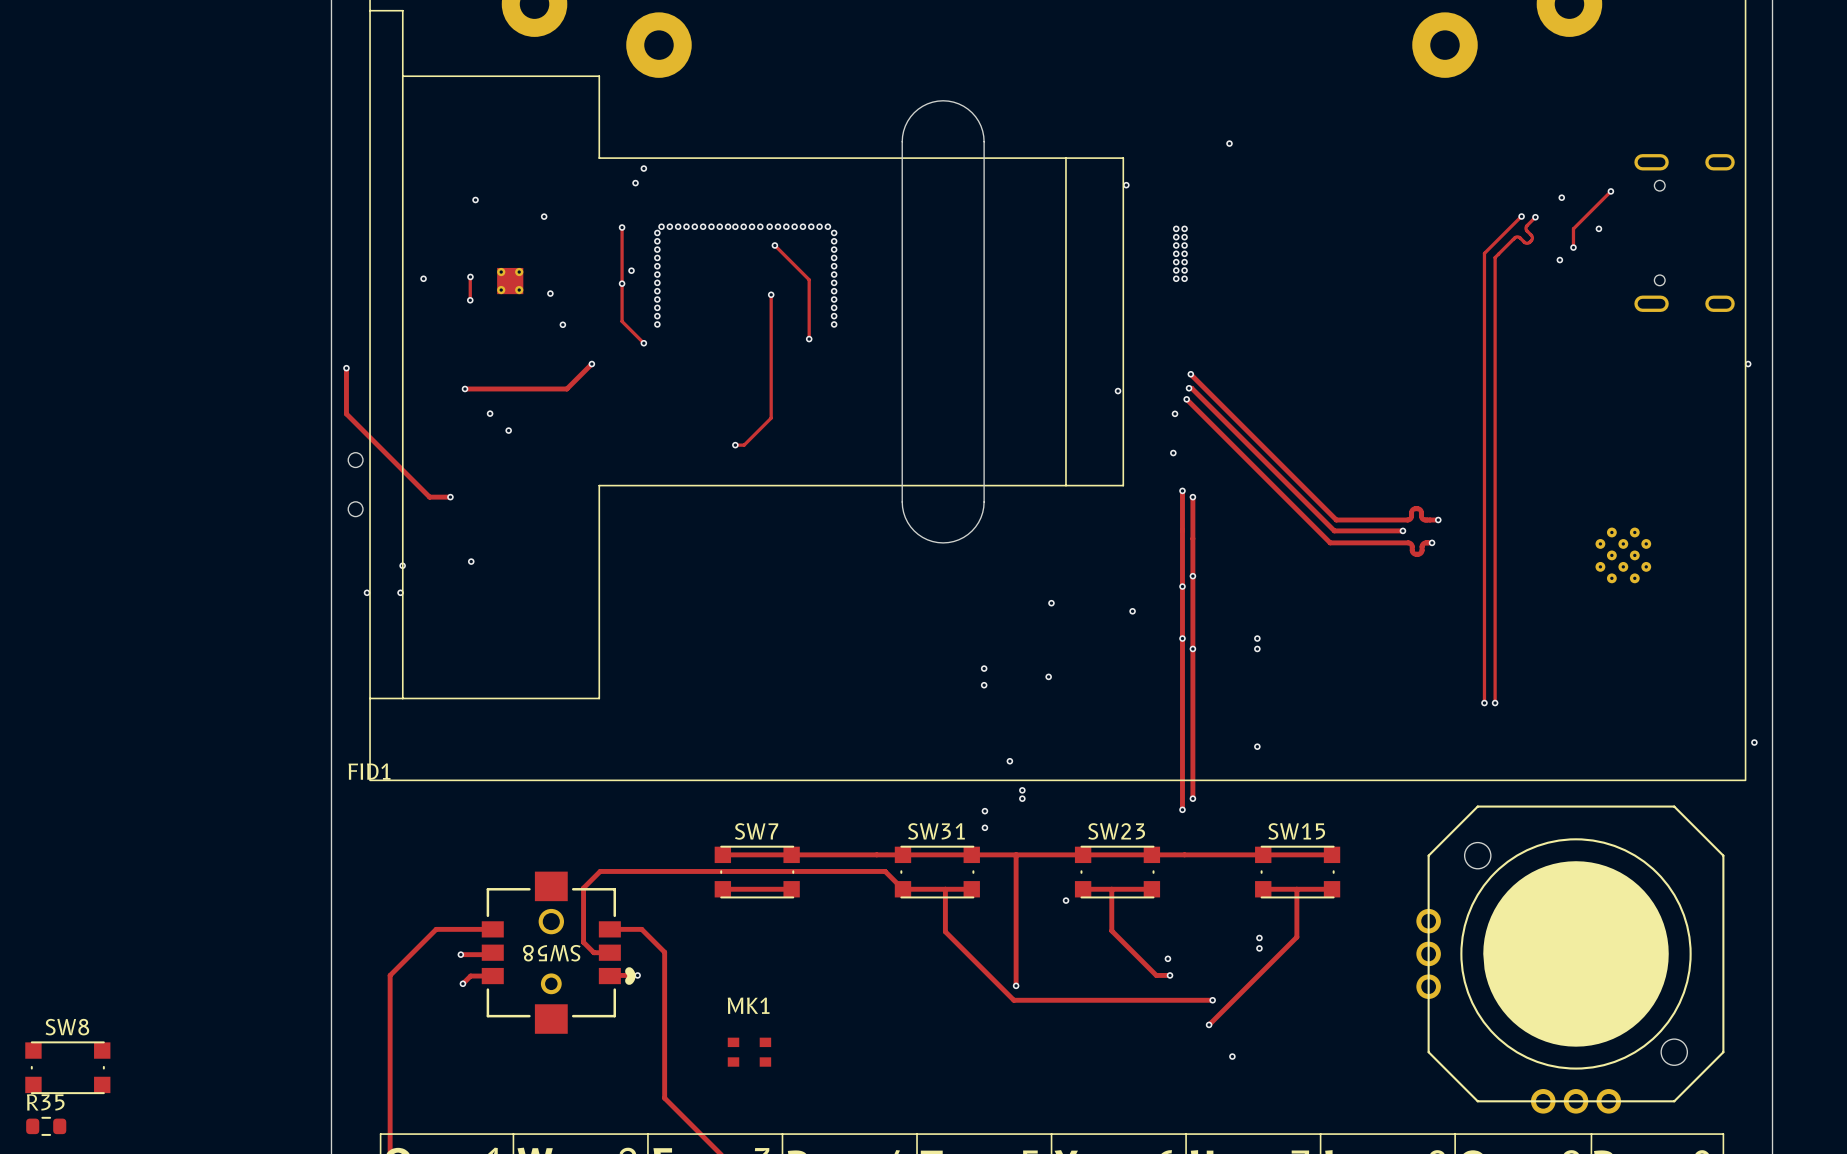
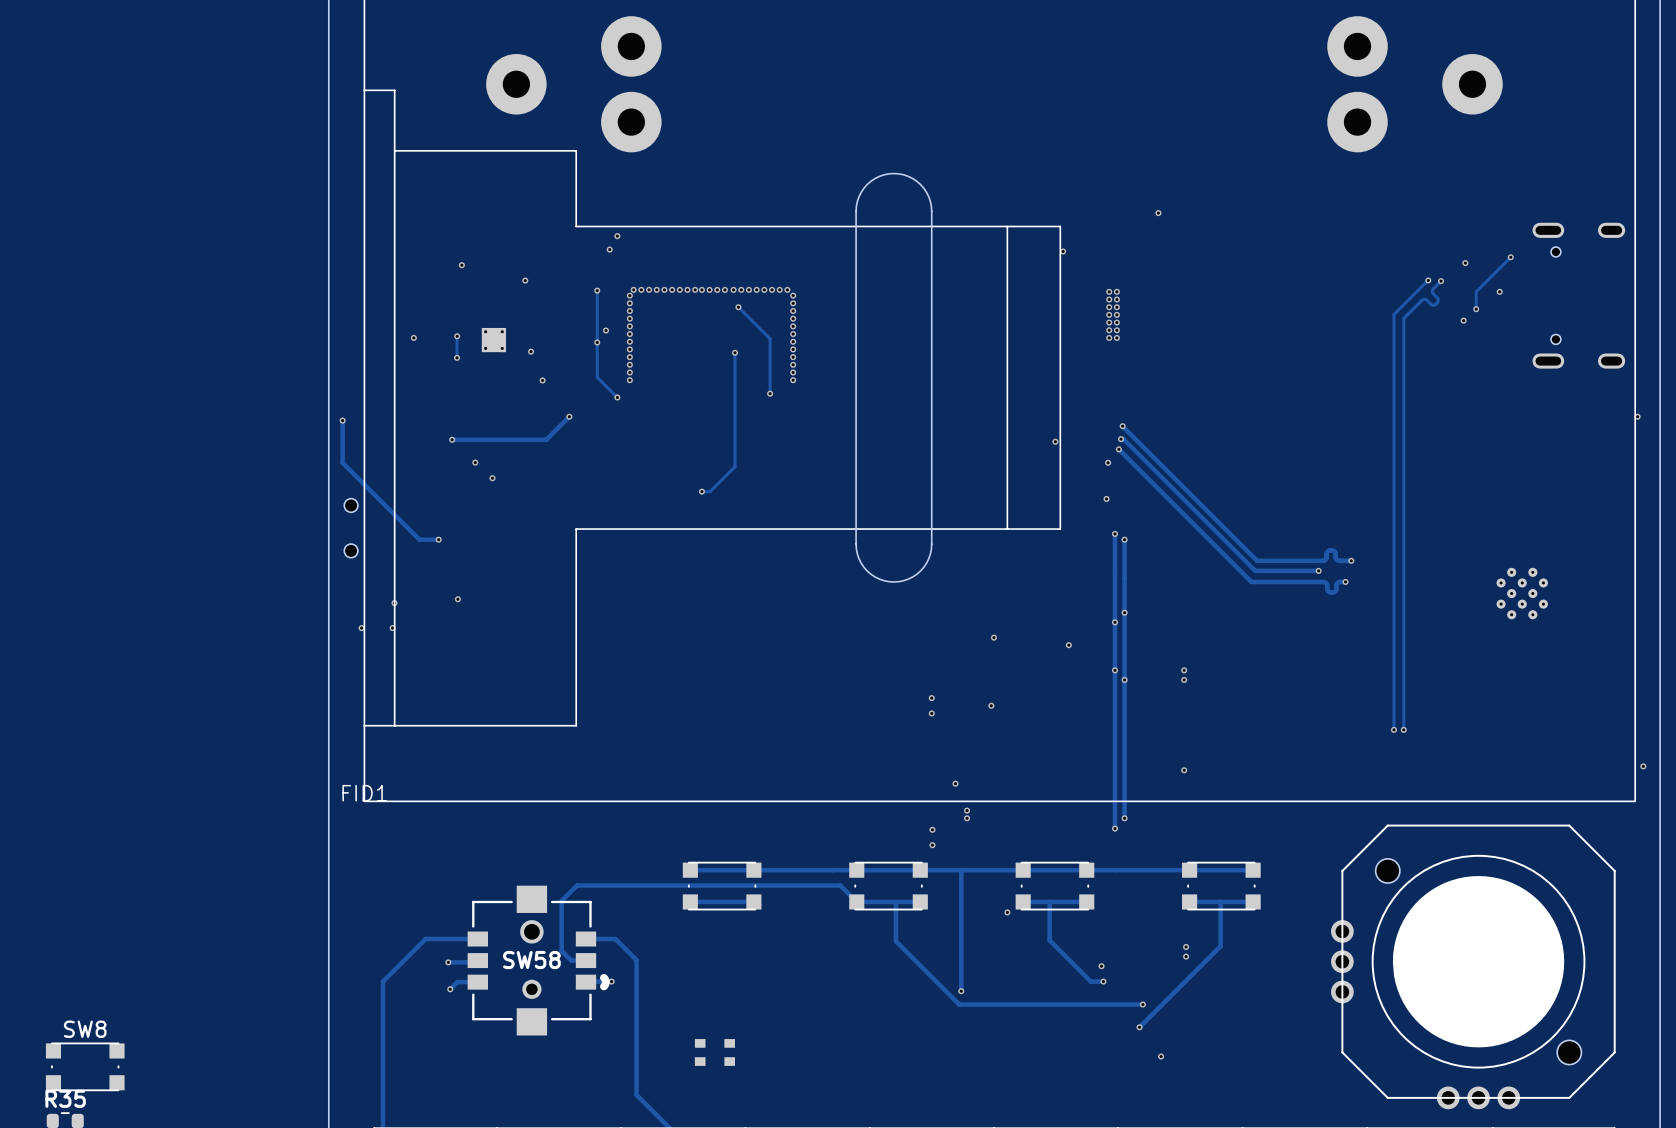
SW7 name: SW7 (756, 831) -> none
SW31 name: SW31 (936, 831) -> none
SW23 name: SW23 (1116, 831) -> none
SW15 name: SW15 (1296, 831) -> none
SW58 name rotation: 0° (551, 953) -> 180° (531, 960)
MK1 name: MK1 (748, 1005) -> none

